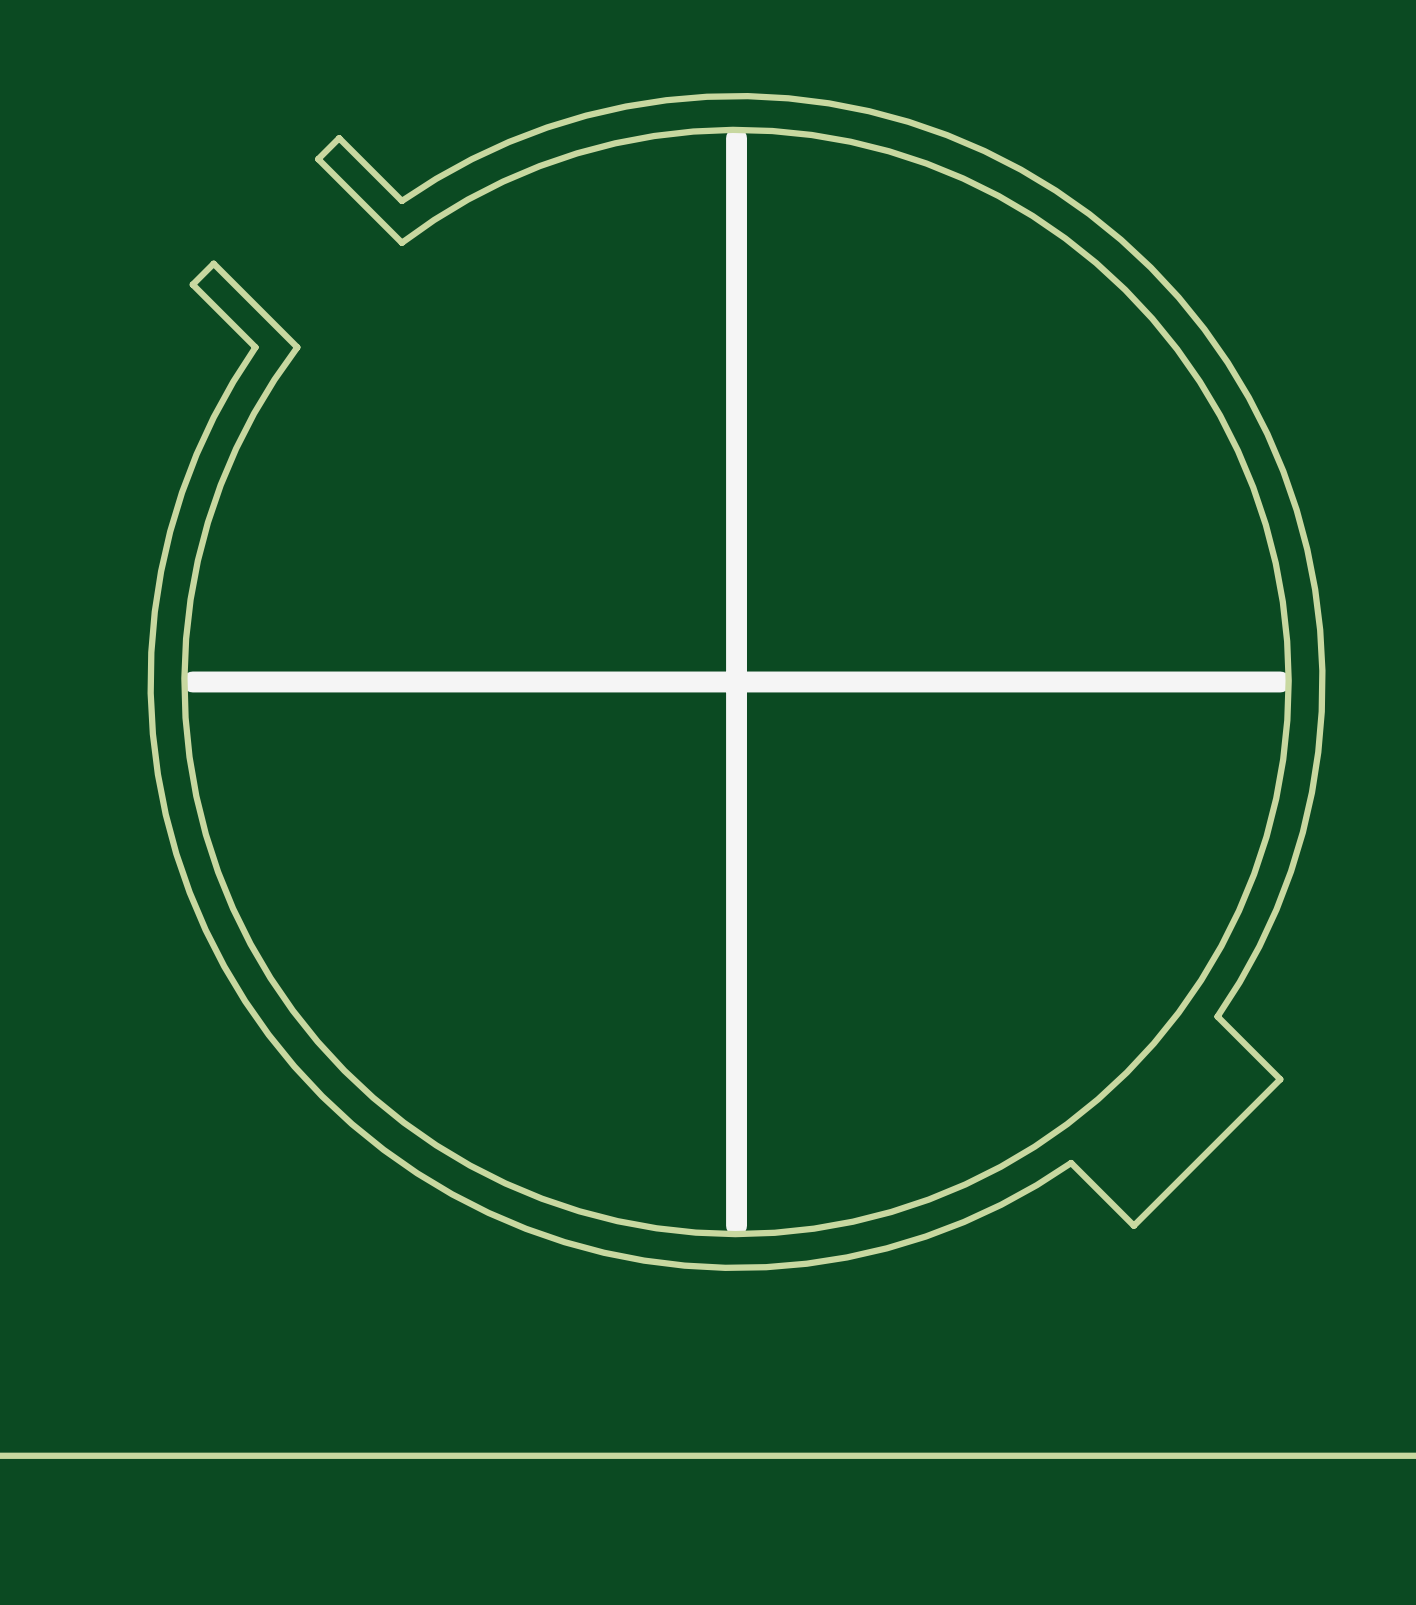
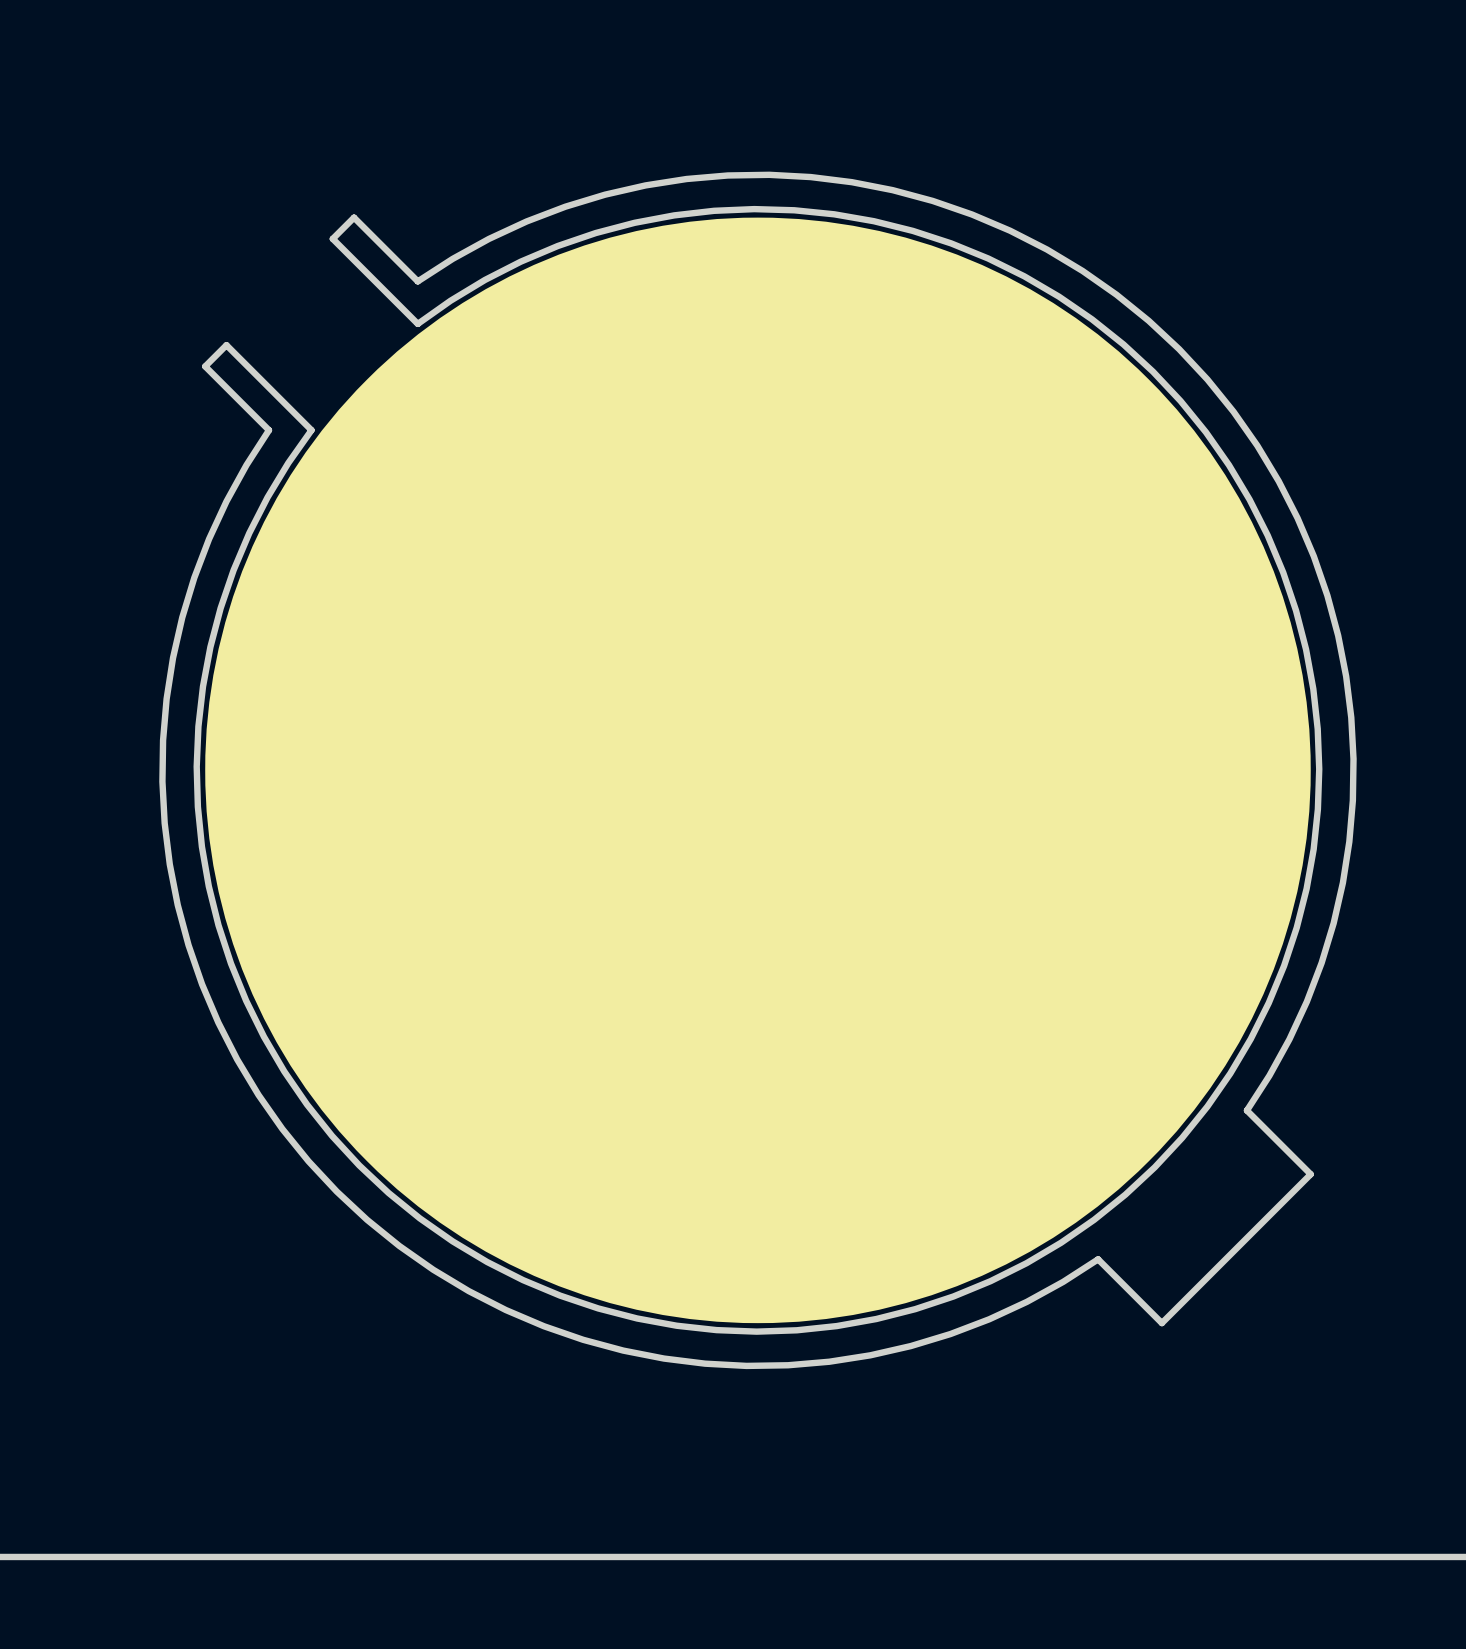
drawing: none -> [205, 217, 1311, 1324]
line: (736, 138) (736, 1225) -> none
line: (1280, 681) (192, 681) -> none

